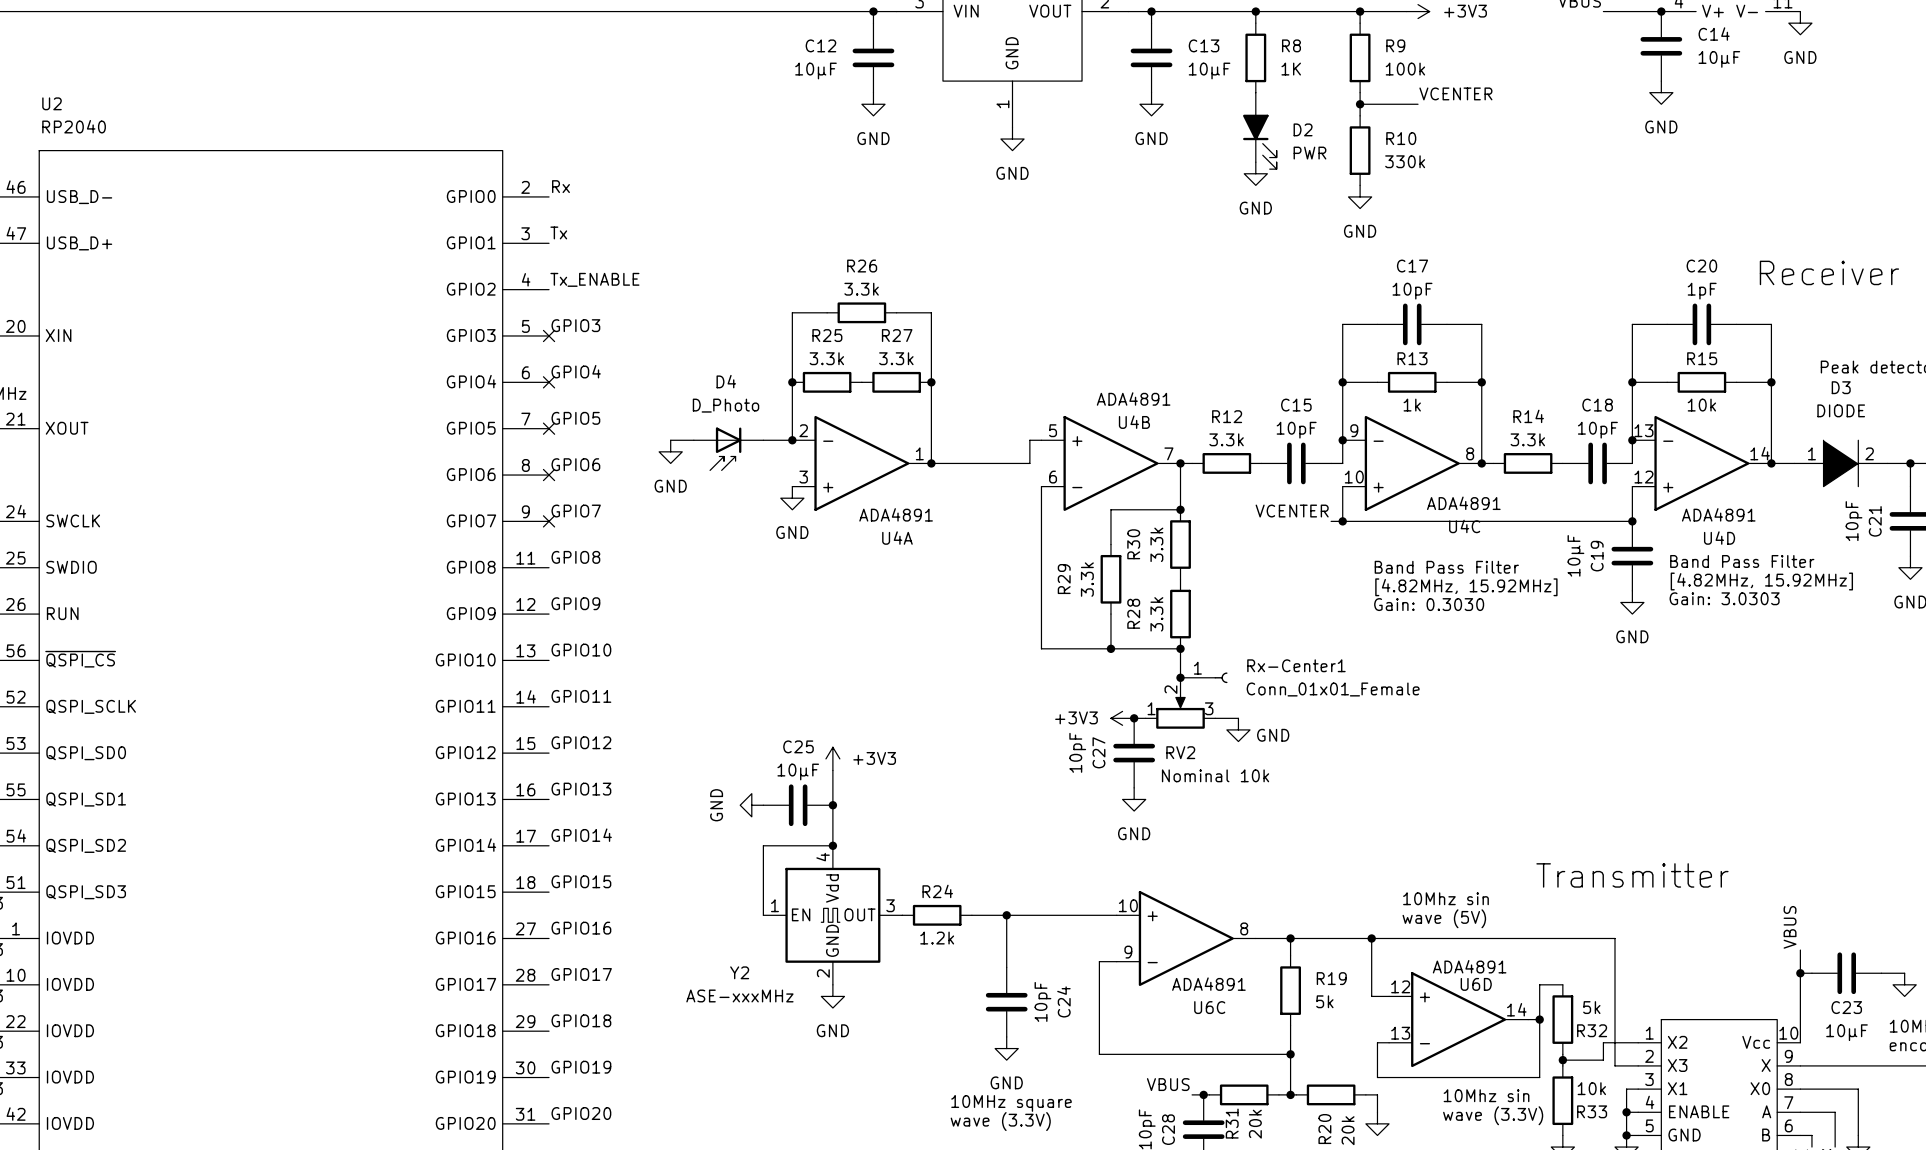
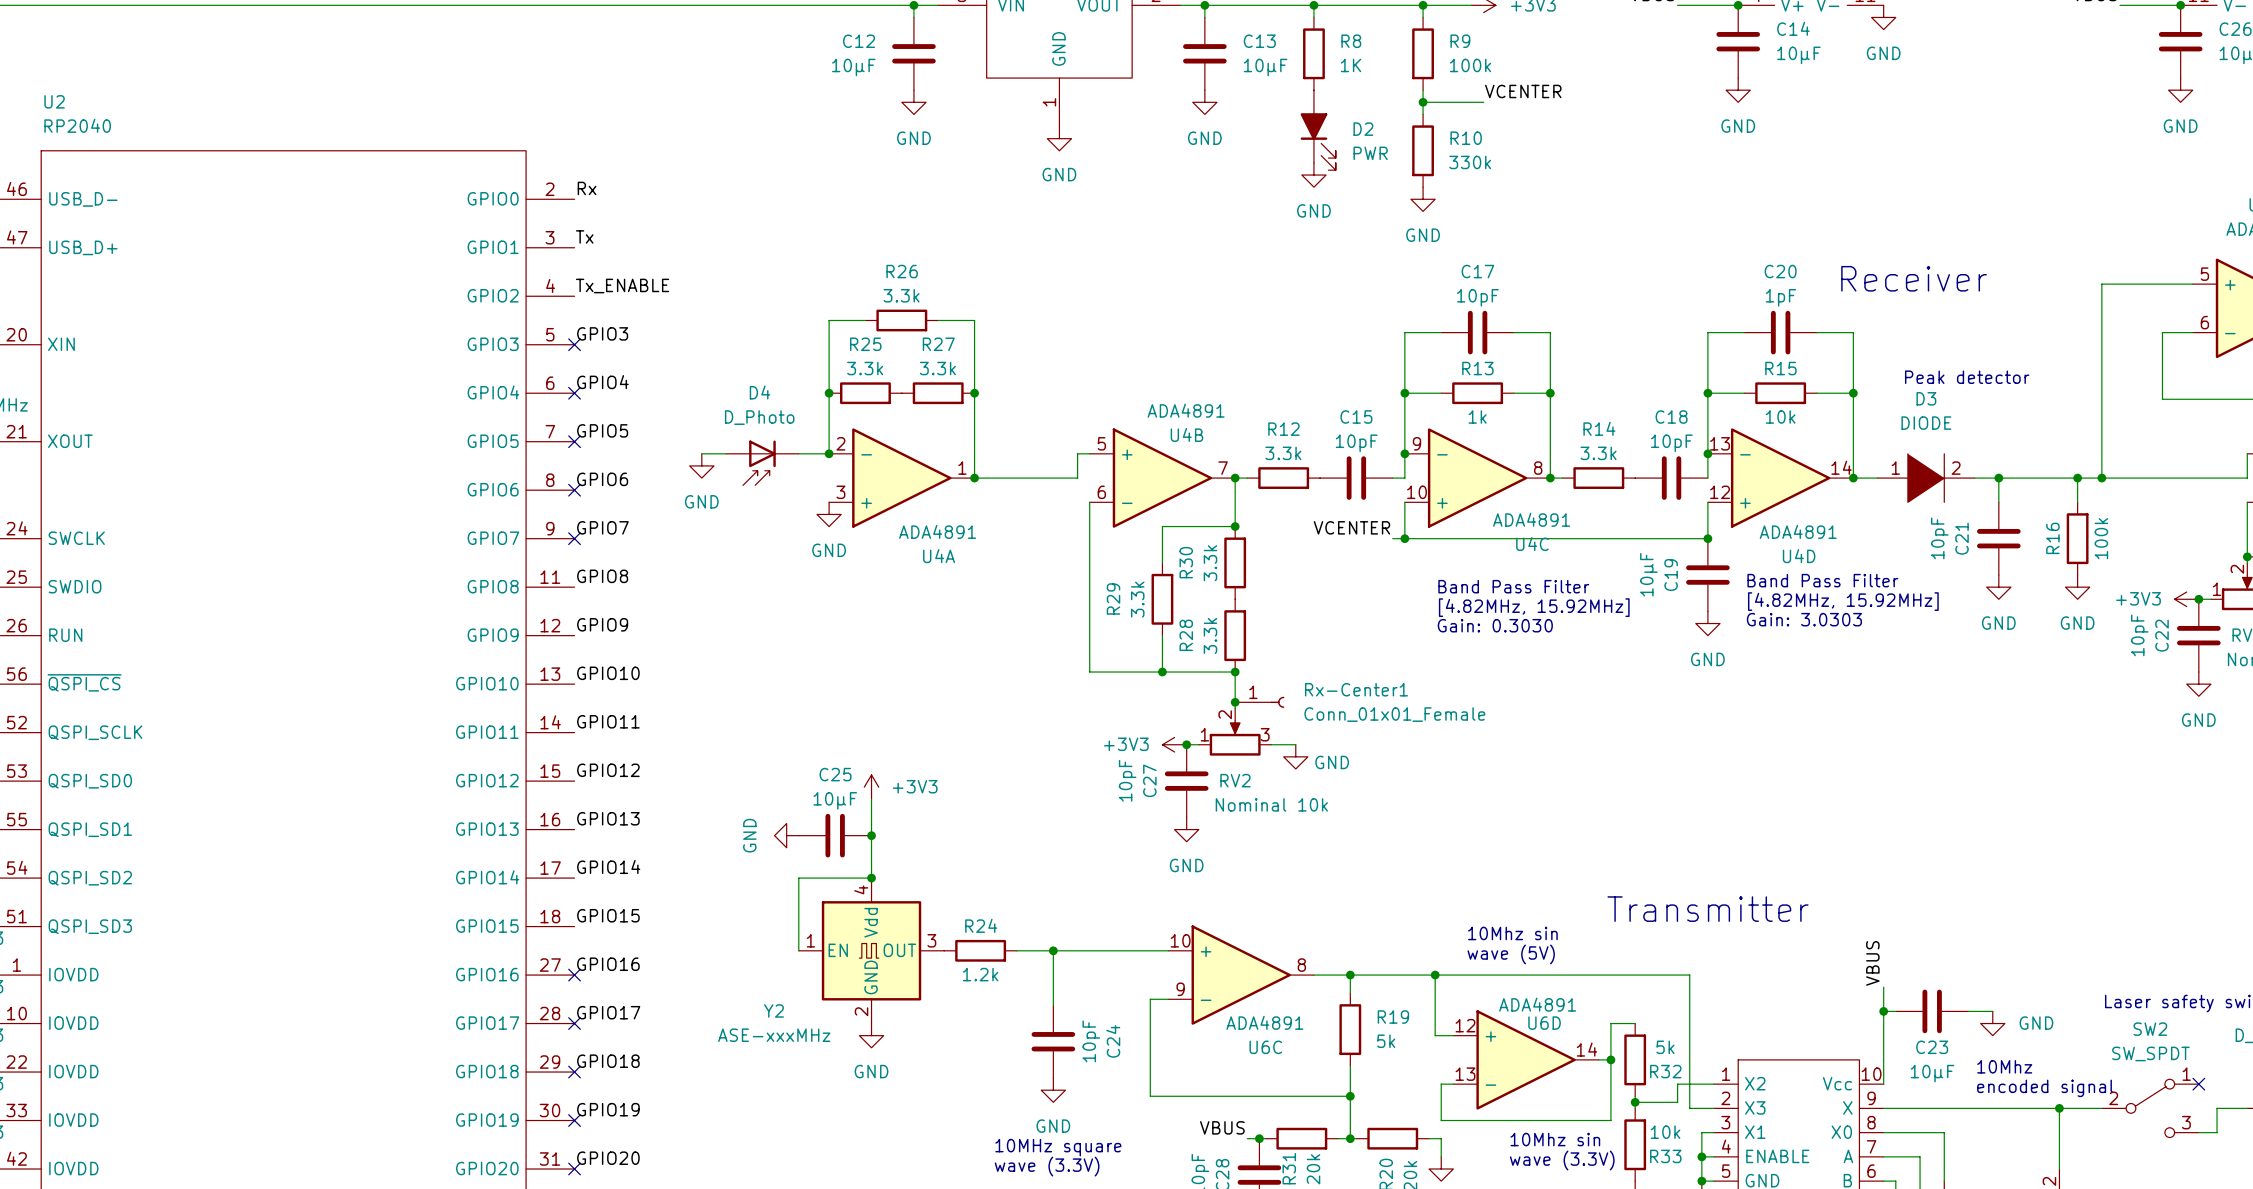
no-connect mark: none -> (574, 975)
no-connect mark: none -> (574, 1023)
no-connect mark: none -> (574, 1072)
no-connect mark: none -> (574, 1120)
no-connect mark: none -> (574, 1168)

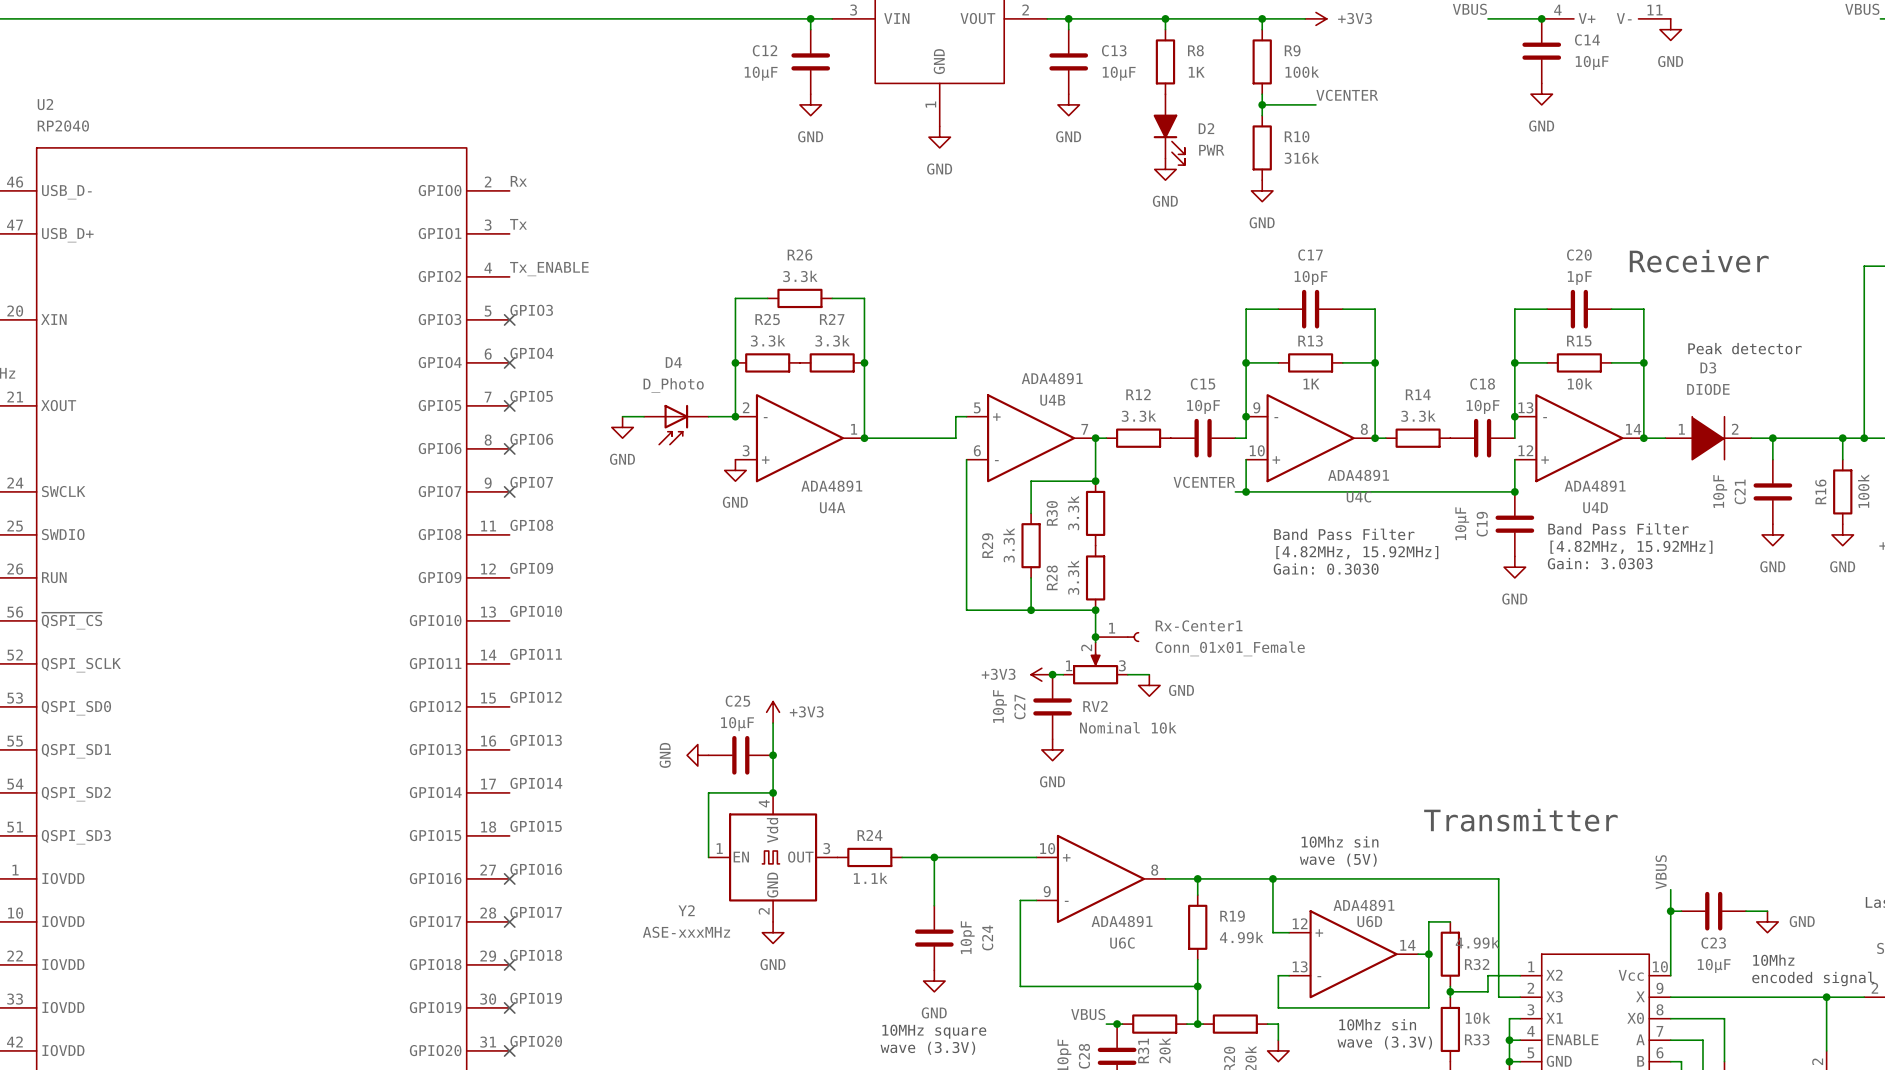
R10 value: 330k (1470, 162) -> 316k (1301, 158)
R13 value: 1k (1477, 417) -> 1K (1311, 384)
R24 value: 1.2k (980, 974) -> 1.1k (870, 878)
R19 value: 5k (1386, 1041) -> 4.99k (1241, 937)
R32 value: 5k (1665, 1047) -> 4.99k (1477, 942)

